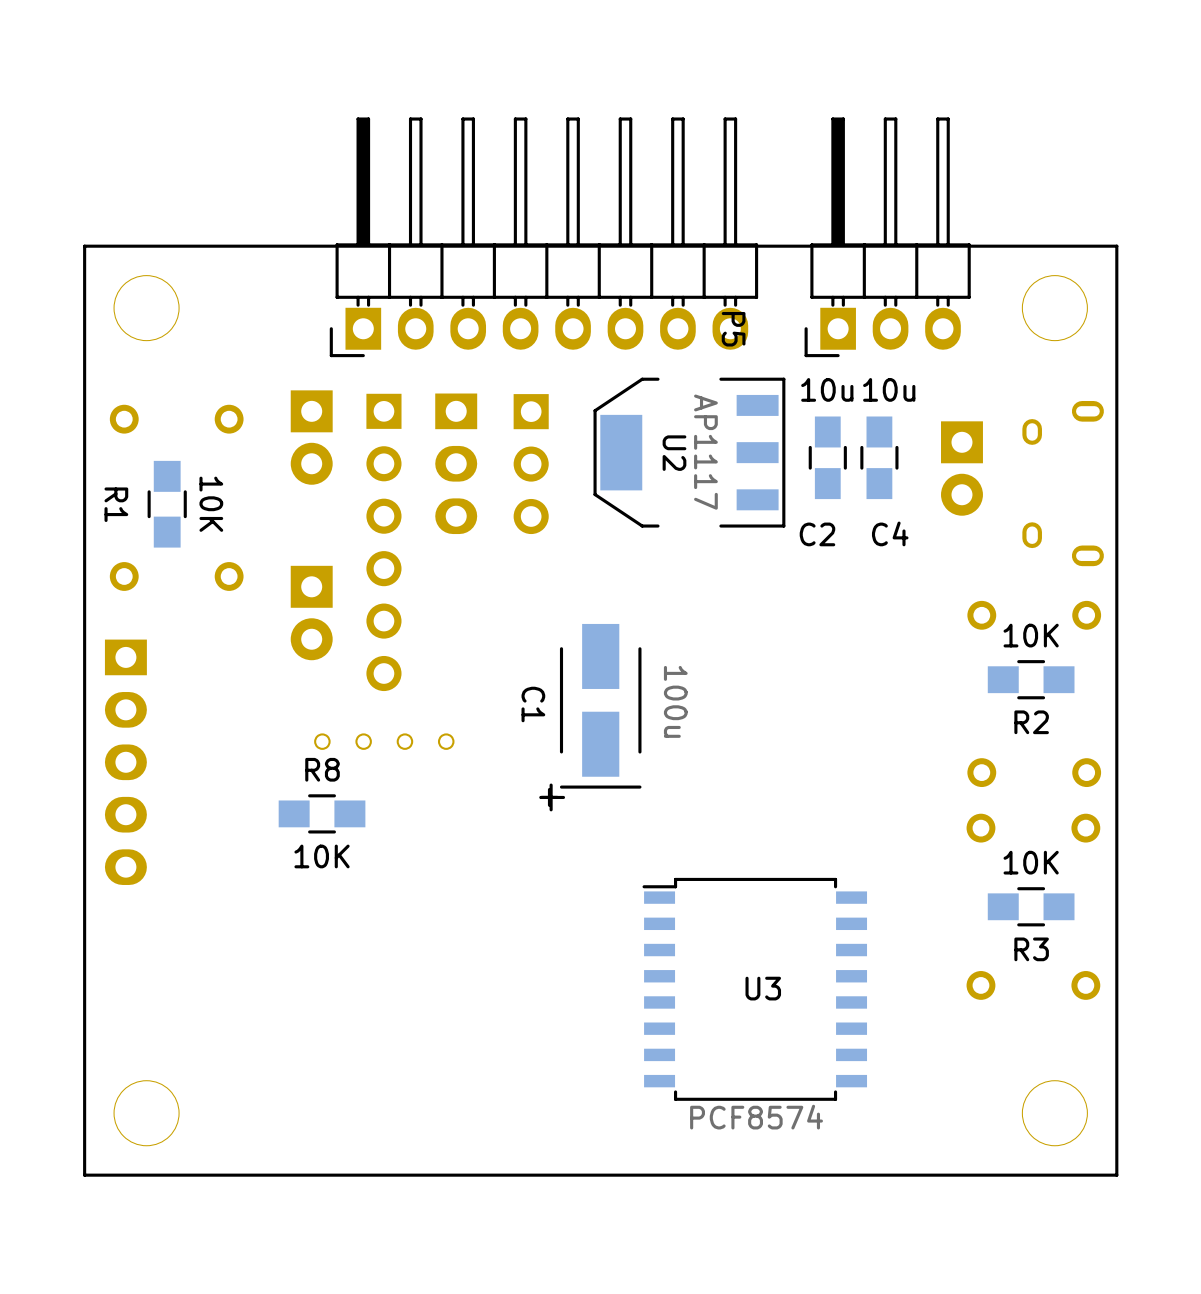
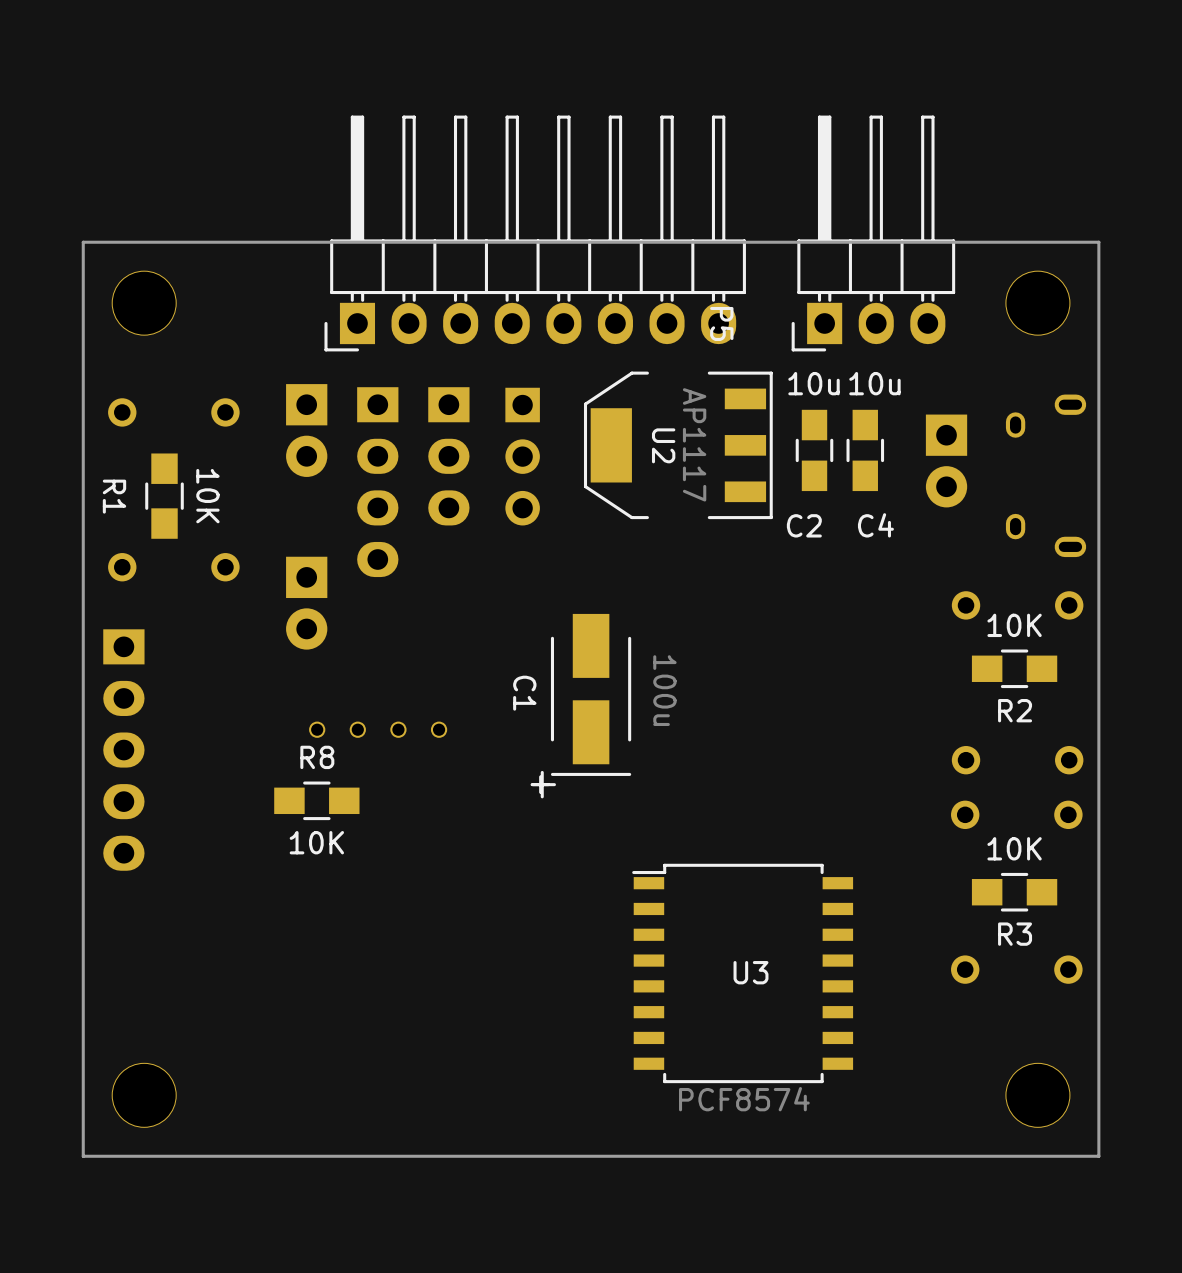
part: none -> (377, 482)
part: (383, 542) -> none

